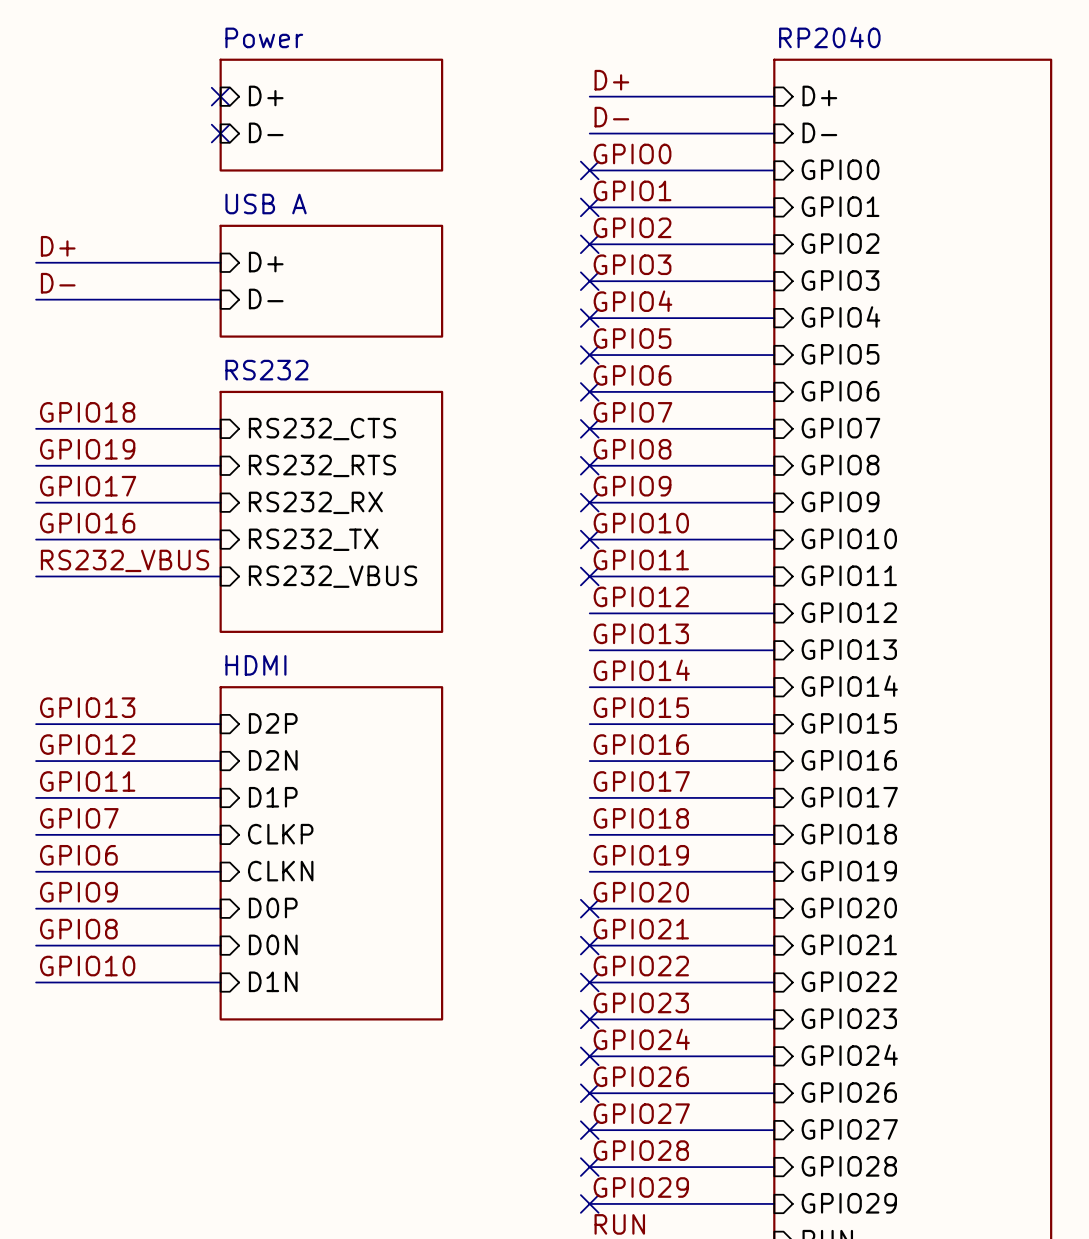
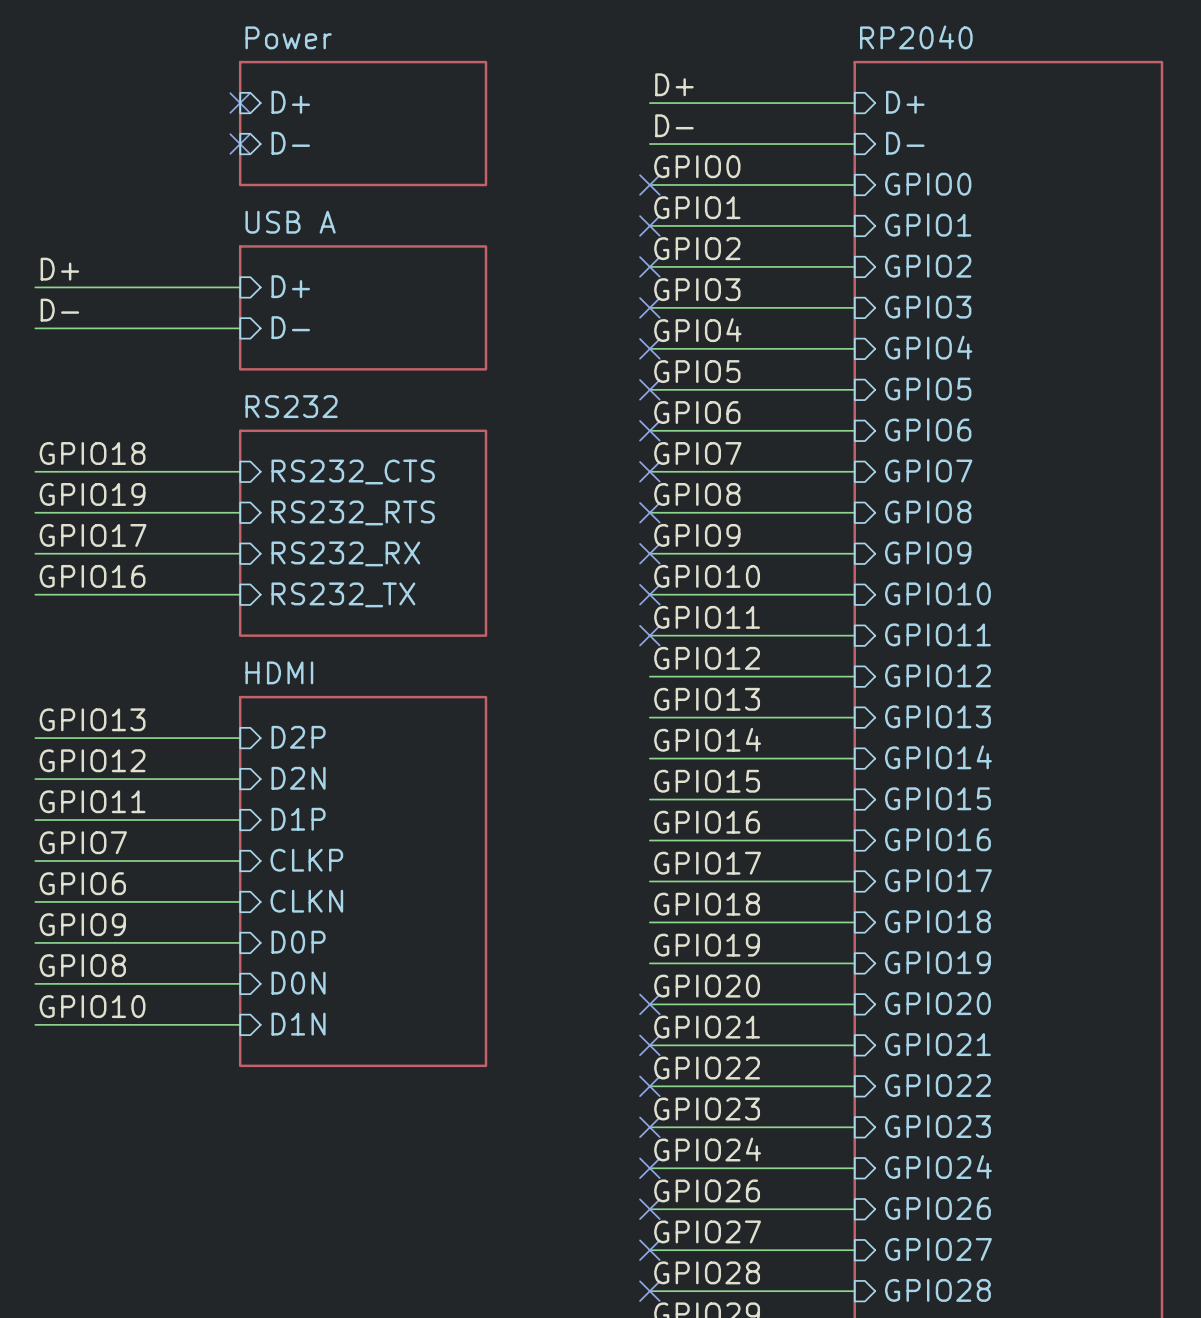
sheet RS232 shape: [219, 390, 444, 633] -> [238, 429, 488, 637]
label: RS232_VBUS (125, 560) -> none
wire: (36, 576) (220, 576) -> none
sheet pin: RS232_VBUS (332, 576) -> none
label position: GPIO13 (87, 707) -> GPIO13 (92, 719)
sheet pin position: D2P (273, 723) -> D2P (298, 737)
wire: (36, 724) (220, 724) -> (35, 738) (240, 738)
label position: GPIO12 (87, 744) -> GPIO12 (92, 760)
sheet pin position: D2N (273, 760) -> D2N (298, 778)
wire: (36, 761) (220, 761) -> (35, 779) (240, 779)
label position: GPIO11 (87, 781) -> GPIO11 (92, 801)
wire: (36, 797) (220, 797) -> (35, 820) (240, 820)
sheet pin position: D1P (273, 797) -> D1P (298, 819)
label position: GPIO7 (79, 818) -> GPIO7 (83, 842)
wire: (36, 834) (220, 834) -> (35, 860) (240, 860)
sheet pin position: CLKP (280, 834) -> CLKP (306, 860)
sheet HDMI position: (331, 853) -> (363, 881)
label position: GPIO6 (78, 855) -> GPIO6 (82, 883)
wire: (36, 871) (220, 871) -> (35, 901) (240, 901)
sheet pin position: CLKN (280, 871) -> CLKN (306, 901)
label position: GPIO9 (78, 892) -> GPIO9 (82, 924)
sheet pin position: D0P (273, 907) -> D0P (298, 942)
wire: (36, 908) (220, 908) -> (35, 942) (240, 942)
label position: GPIO8 (78, 929) -> GPIO8 (82, 965)
sheet pin position: D0N (273, 944) -> D0N (298, 983)
wire: (36, 945) (220, 945) -> (35, 983) (240, 983)
label position: GPIO10 (87, 966) -> GPIO10 (92, 1006)
sheet pin position: D1N (273, 981) -> D1N (298, 1024)
wire: (36, 982) (220, 982) -> (35, 1024) (240, 1024)

